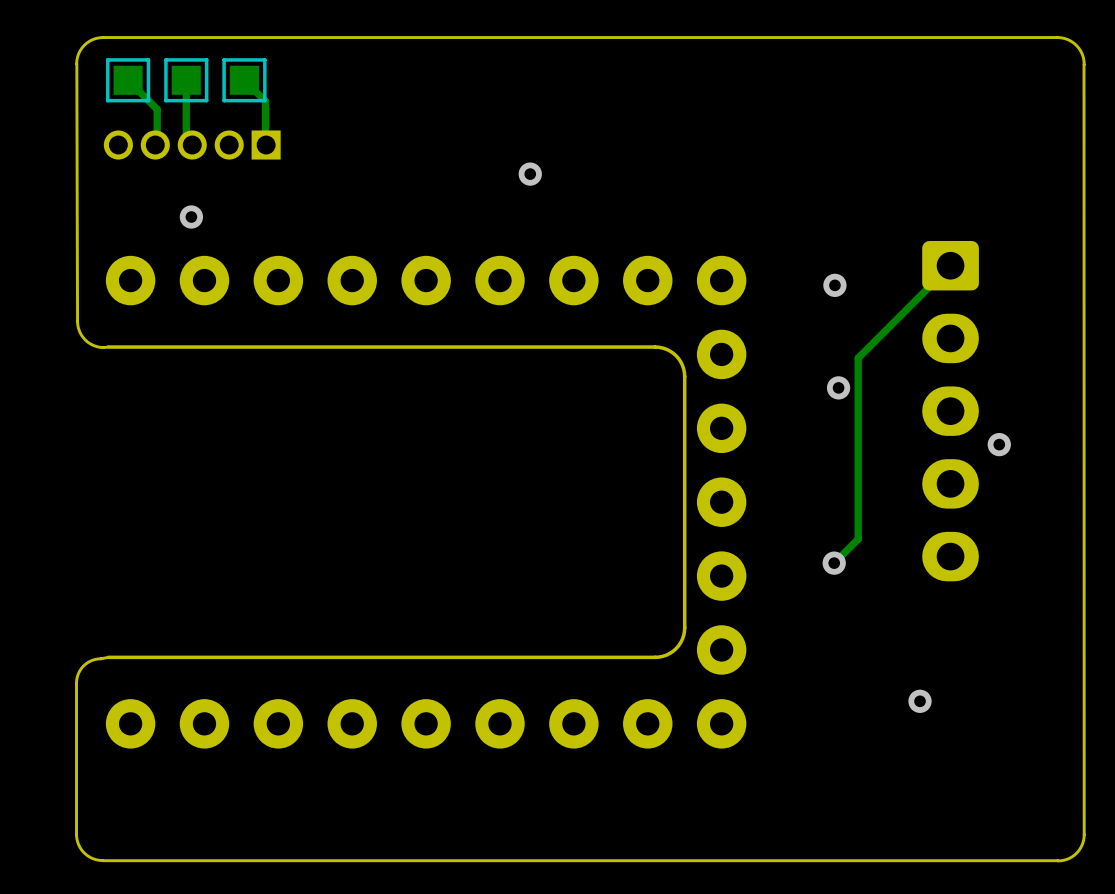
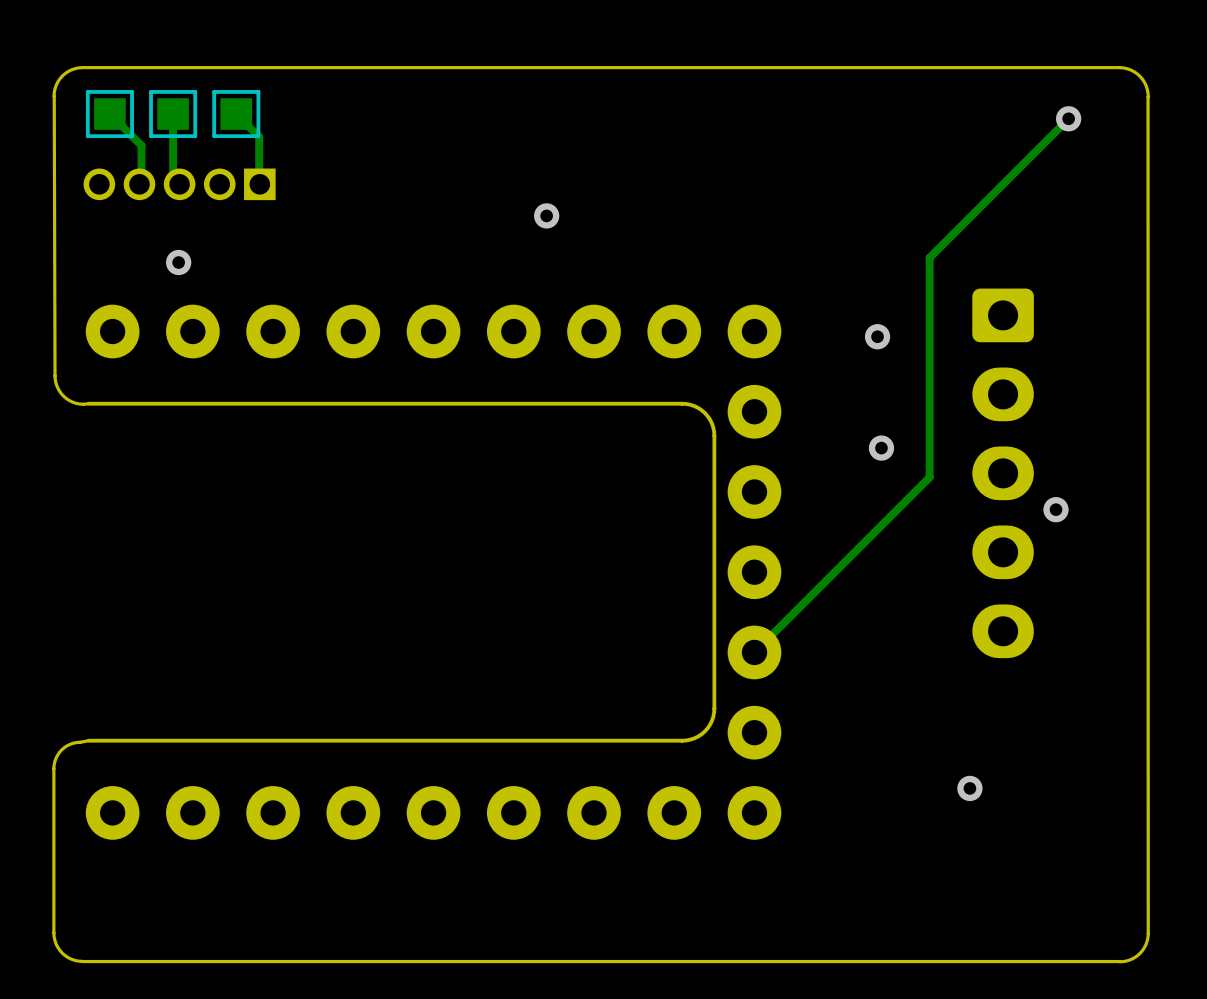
track: none -> (1068, 118) (929, 257) (929, 477) (754, 652)
via: none -> (1068, 118)
track: (950, 265) (858, 358) (858, 539) (834, 563) -> none
via: (834, 563) -> none

